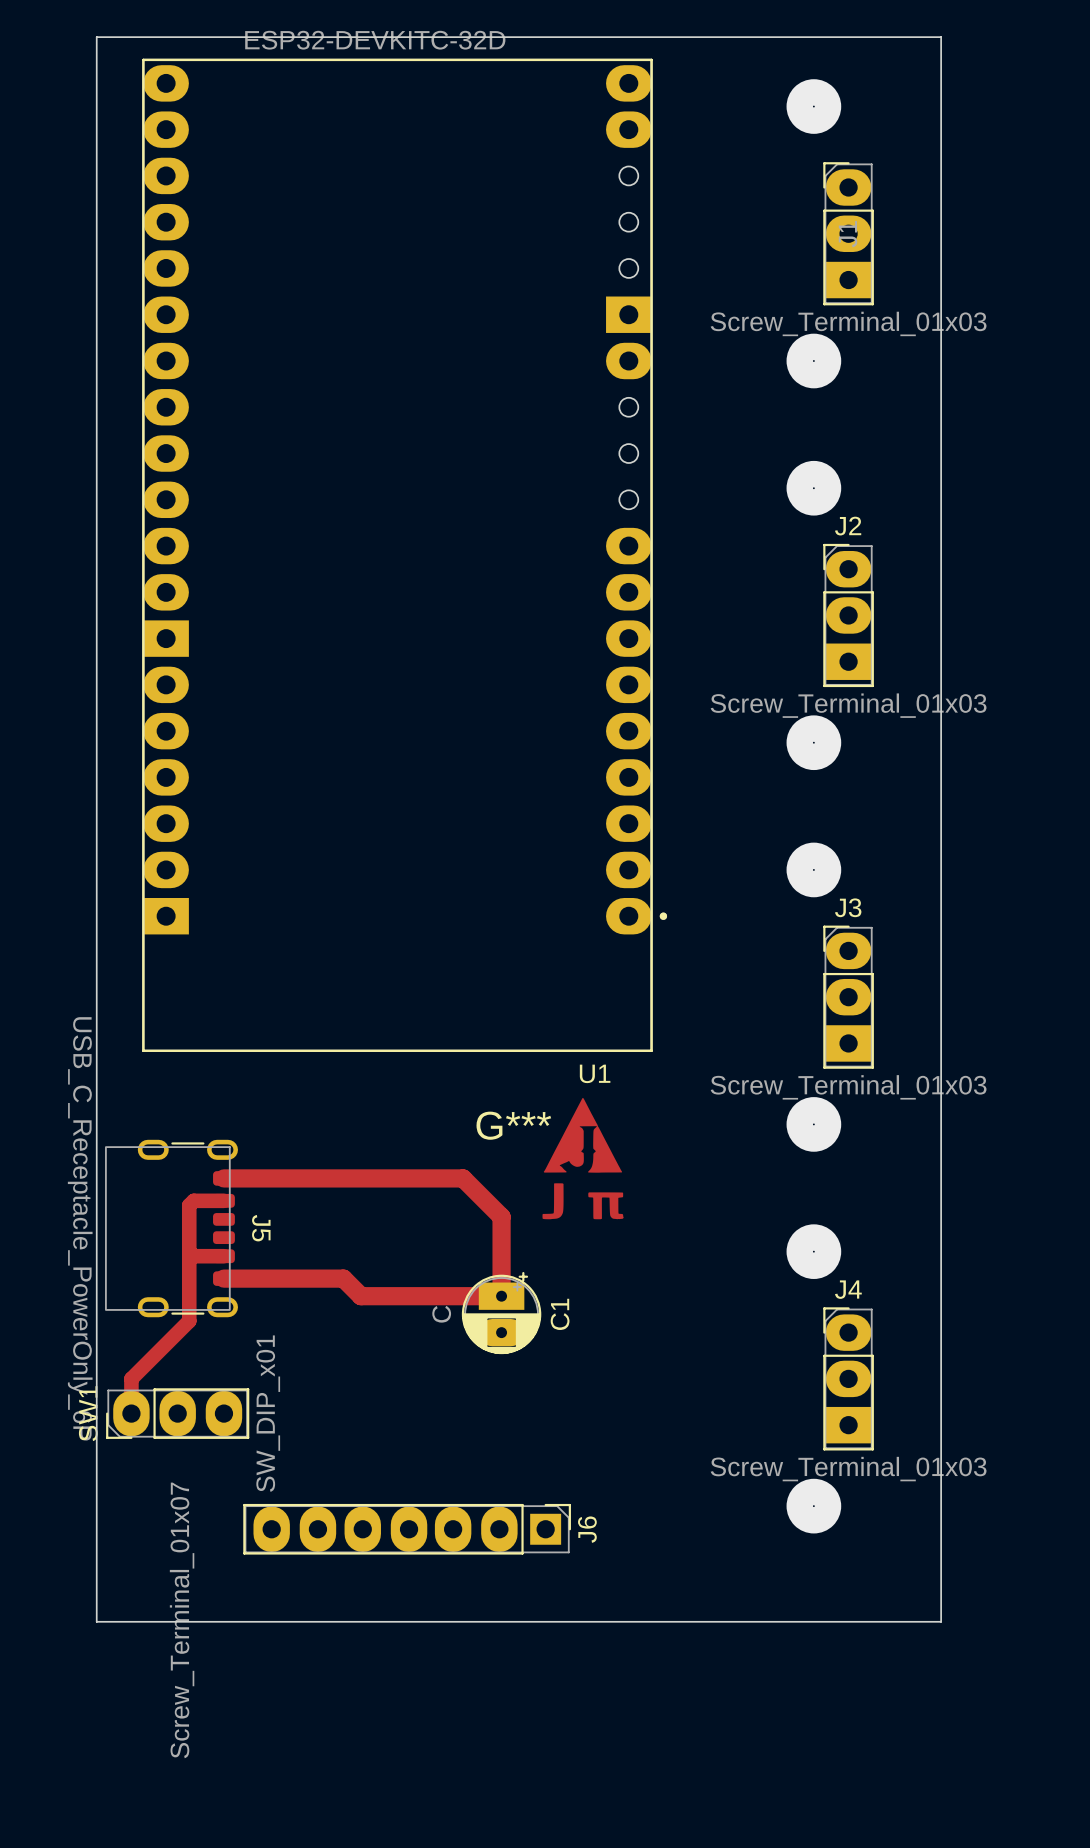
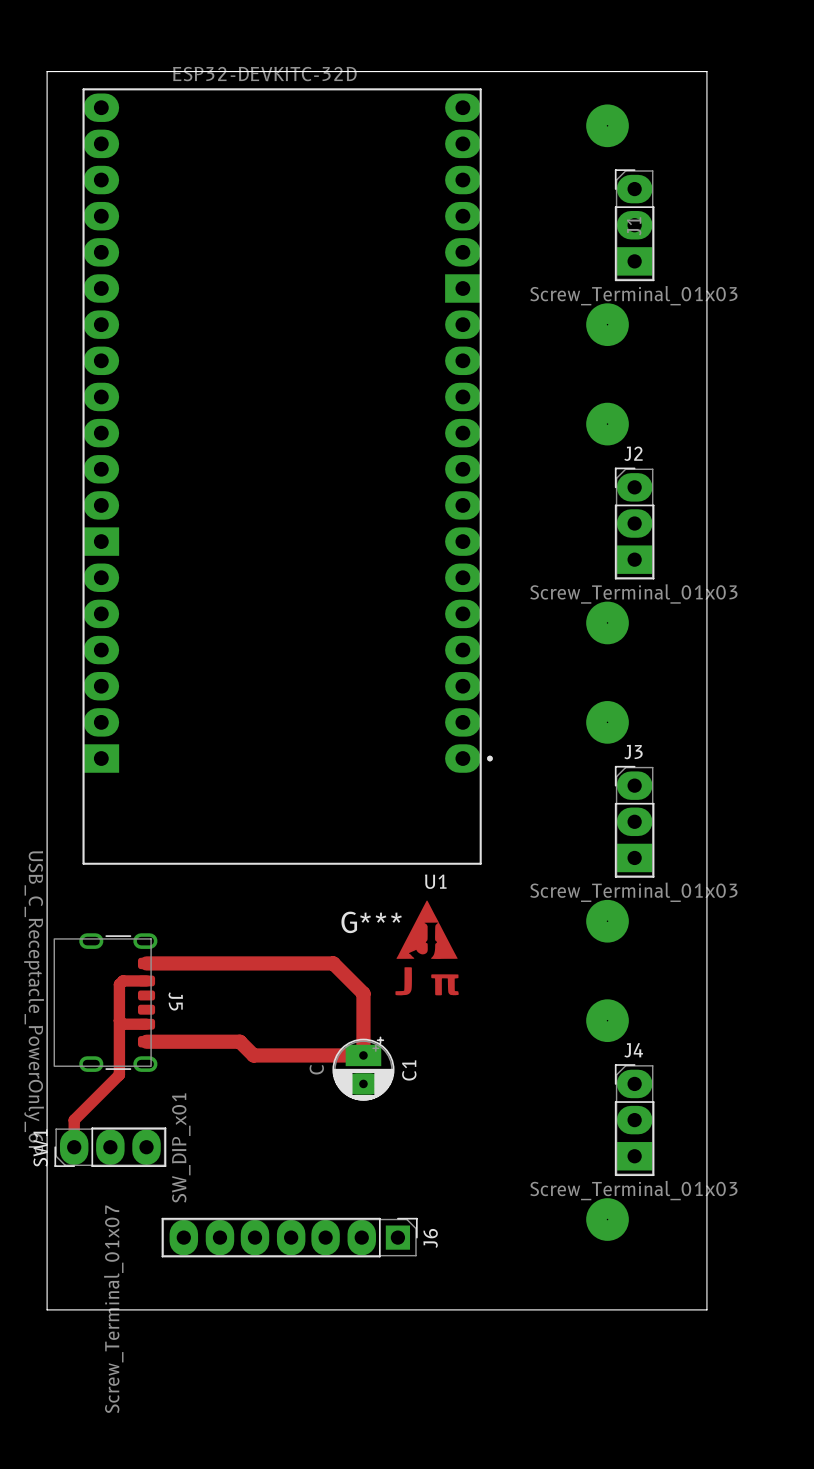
U1 footprint: [142, 58, 668, 1052] -> [82, 88, 493, 865]

